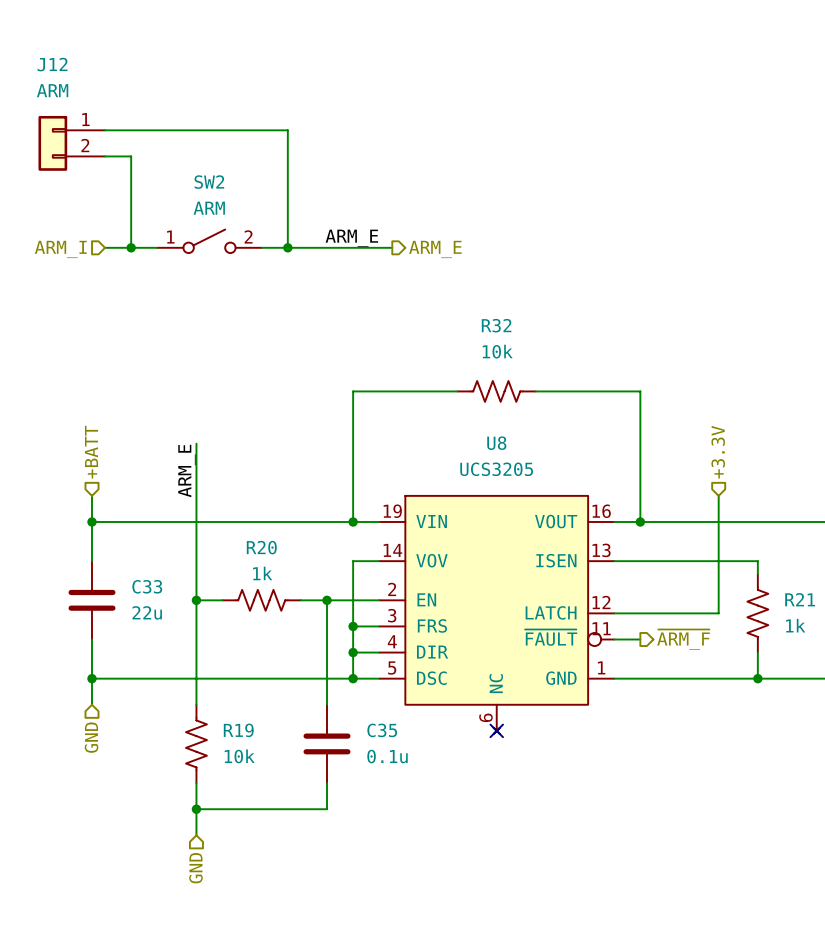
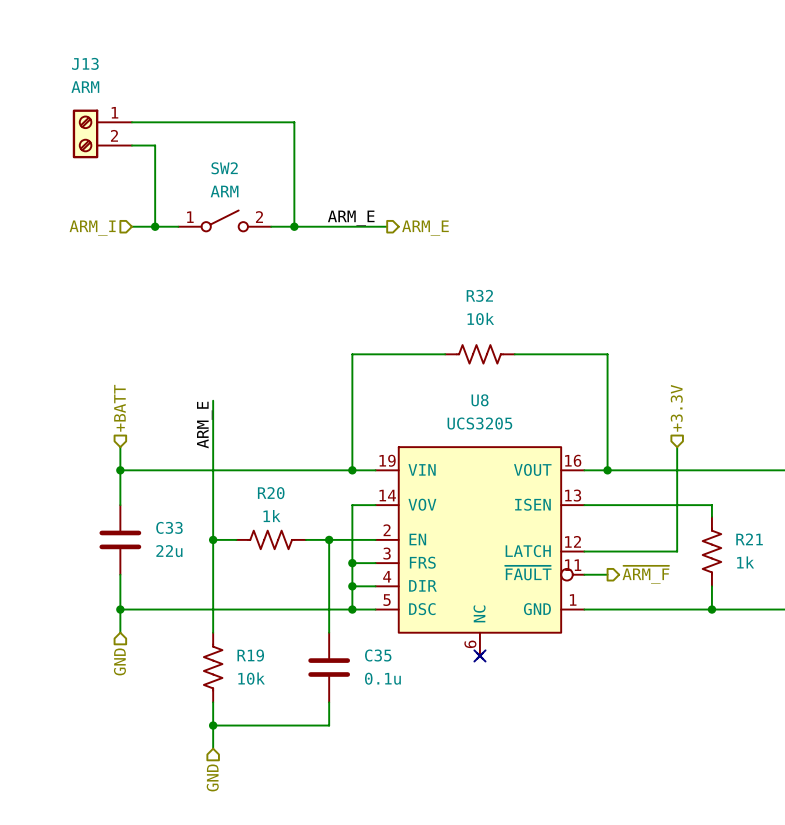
J12: ARM (71, 143) -> none
J13: none -> ARM (102, 133)

